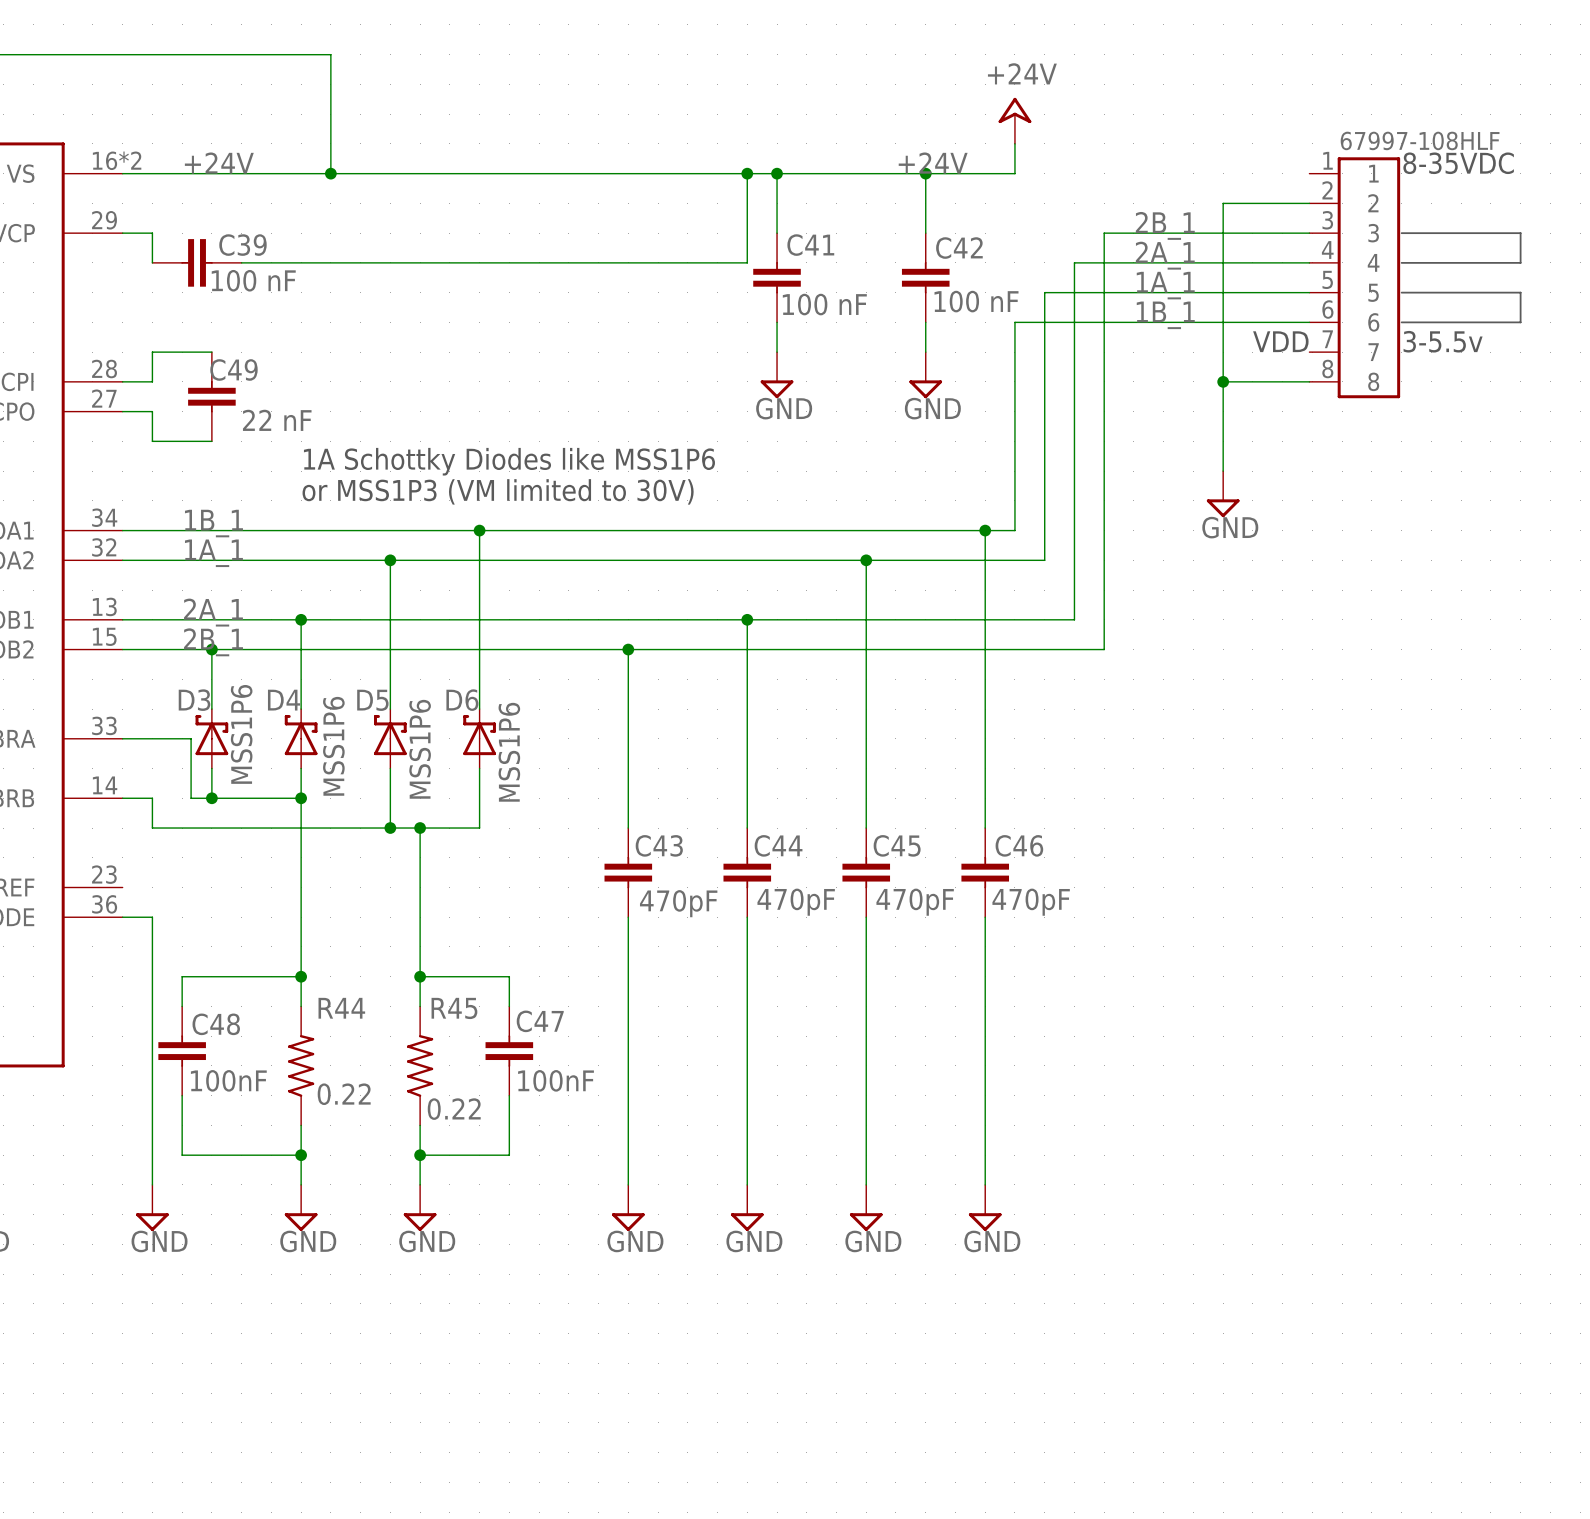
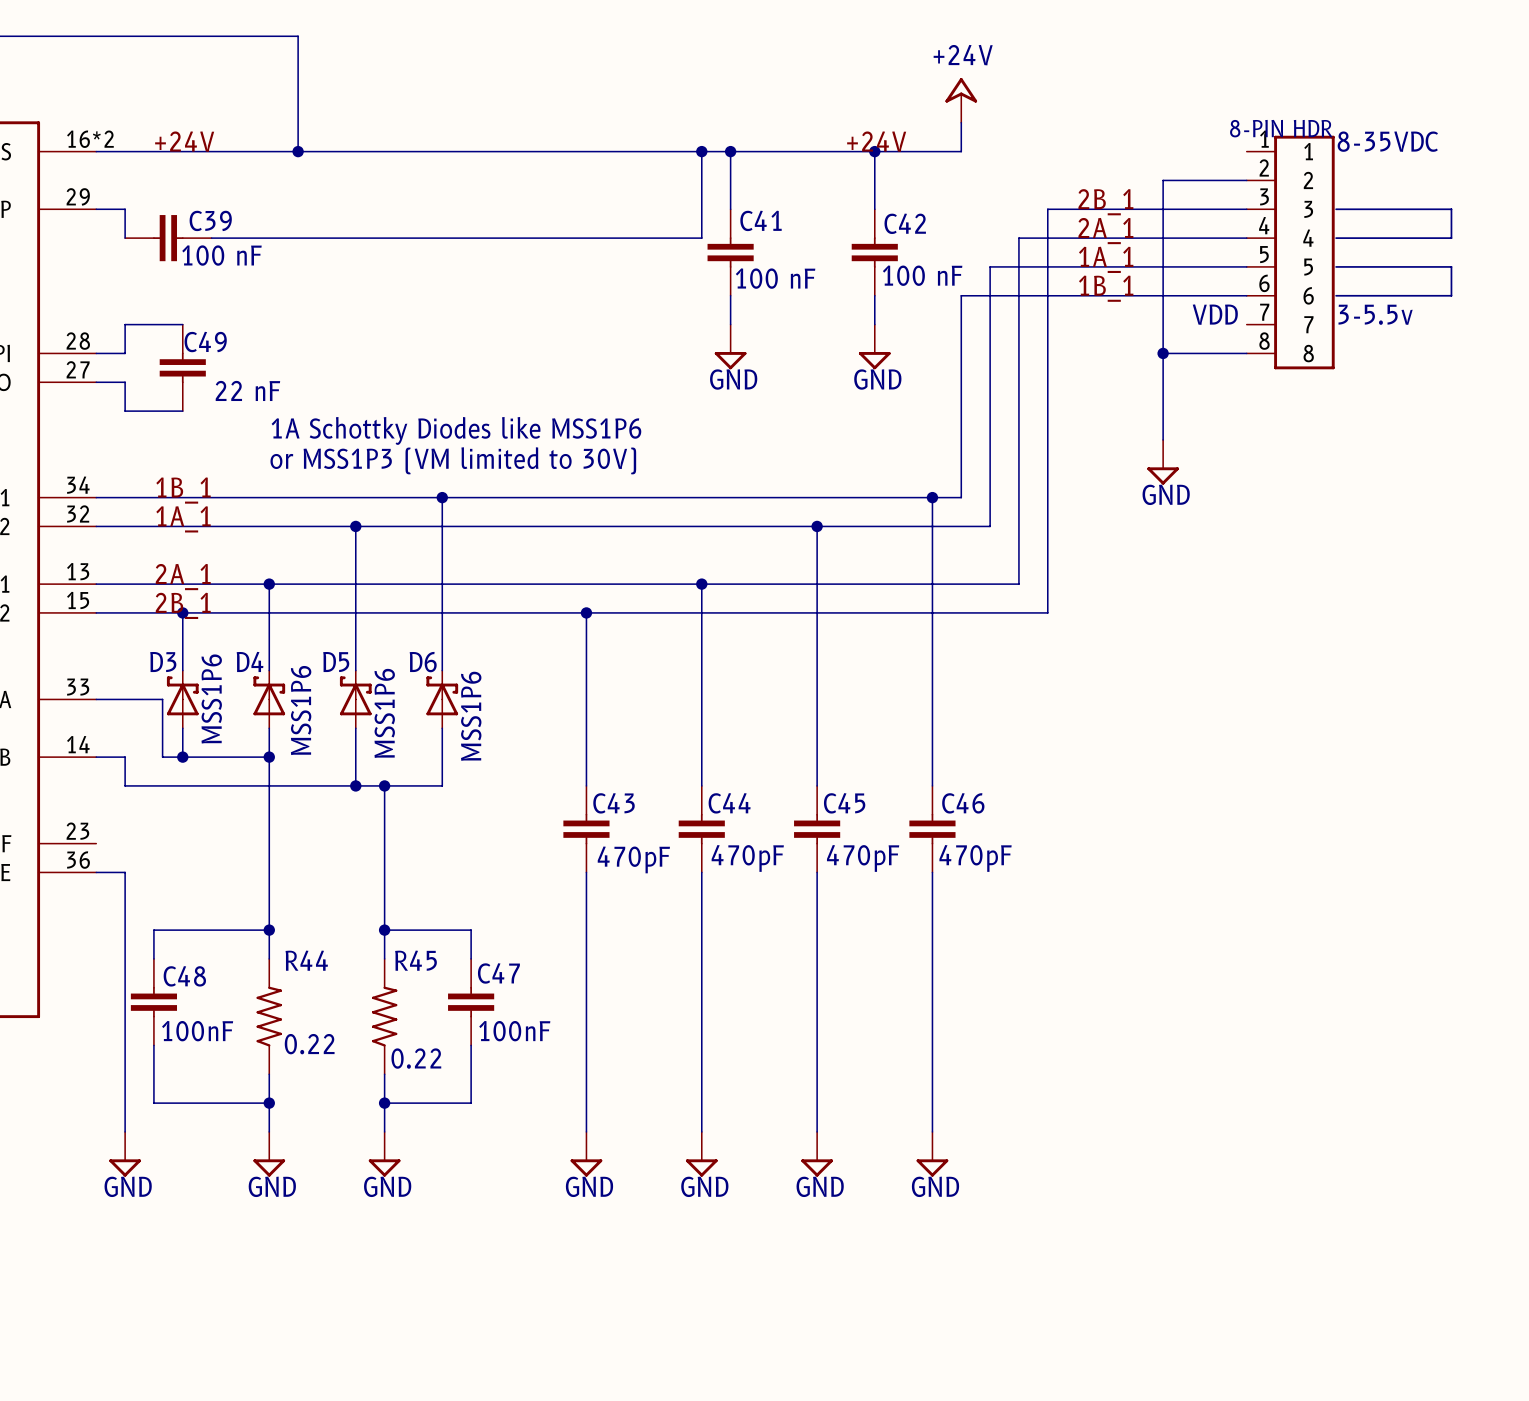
part value: 67997-108HLF (1420, 140) -> 8-PIN HDR (1281, 128)

